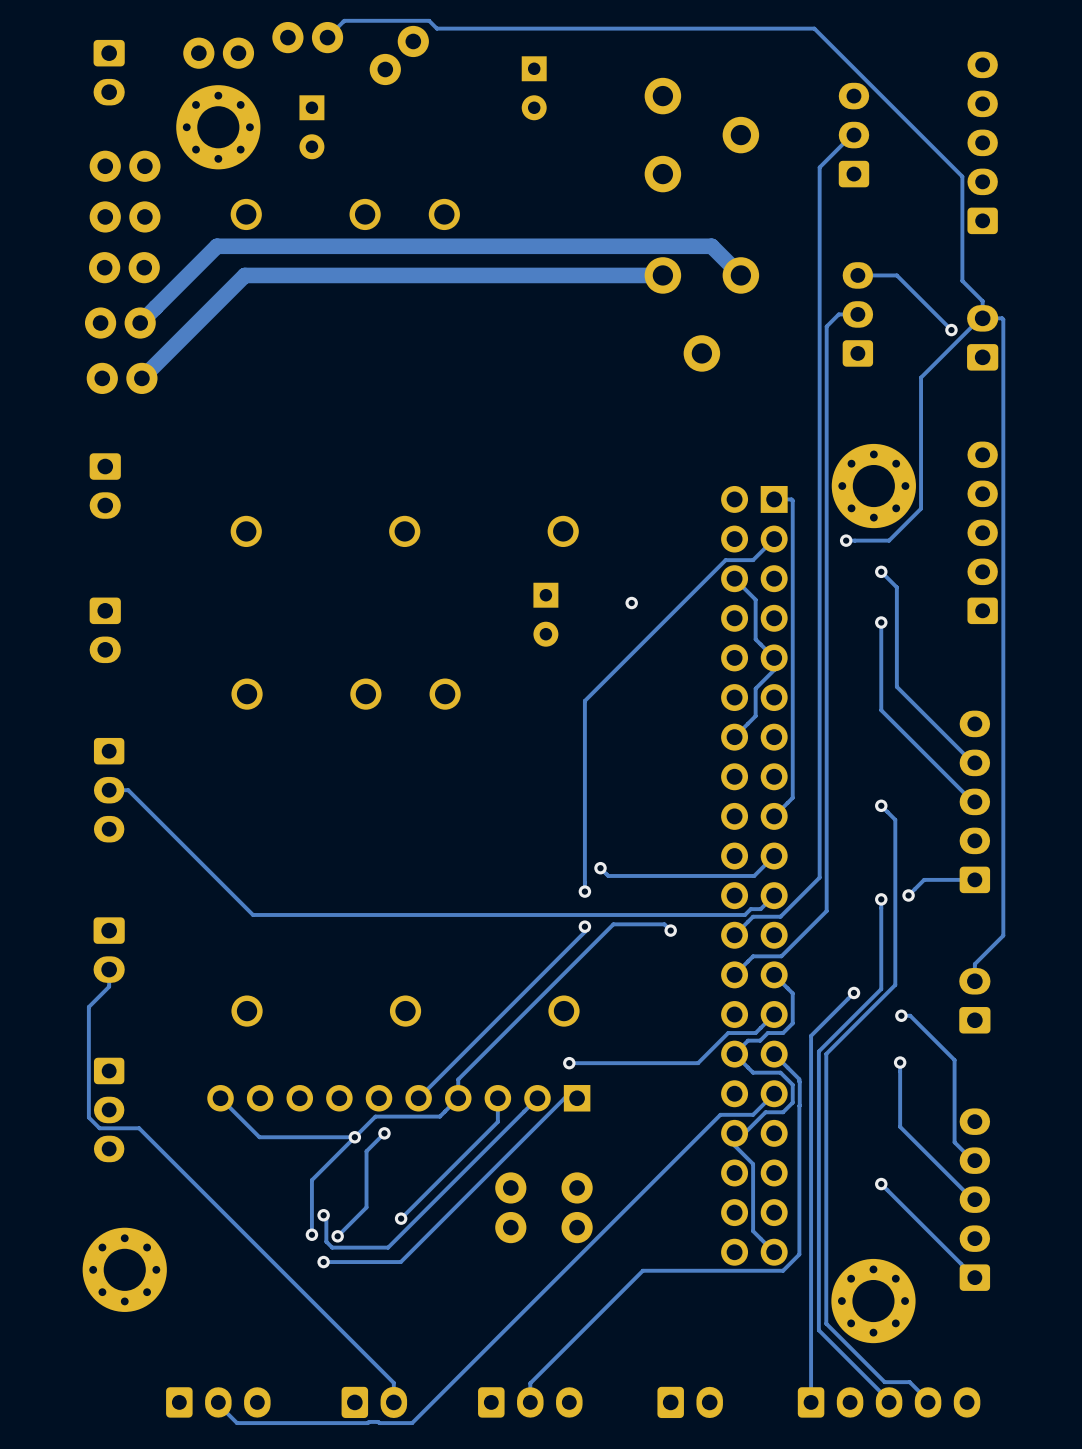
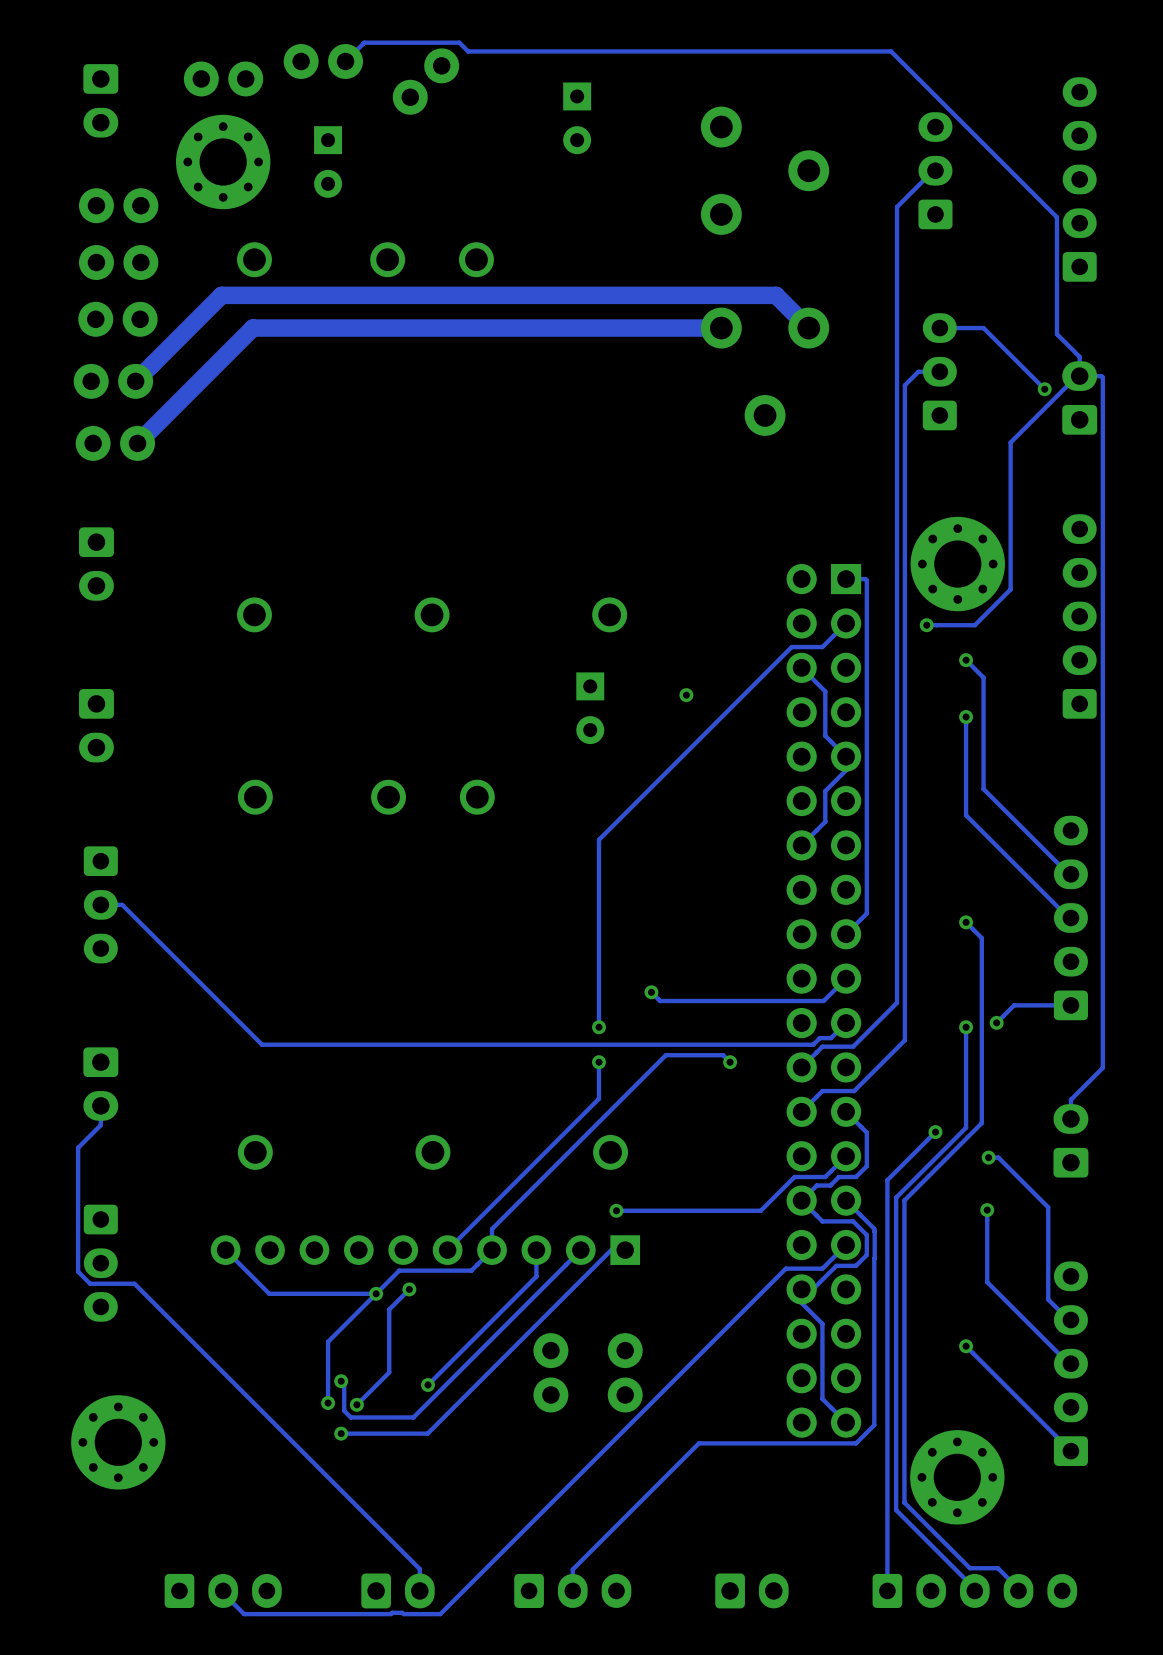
track: (584, 700) (584, 891) -> (633, 804) (599, 839) (599, 1027)
via: (584, 891) -> none
via: none -> (599, 1027)
track: (584, 926) (584, 931) (553, 963) -> (599, 1062) (599, 1098)
via: (584, 926) -> none
via: none -> (599, 1062)

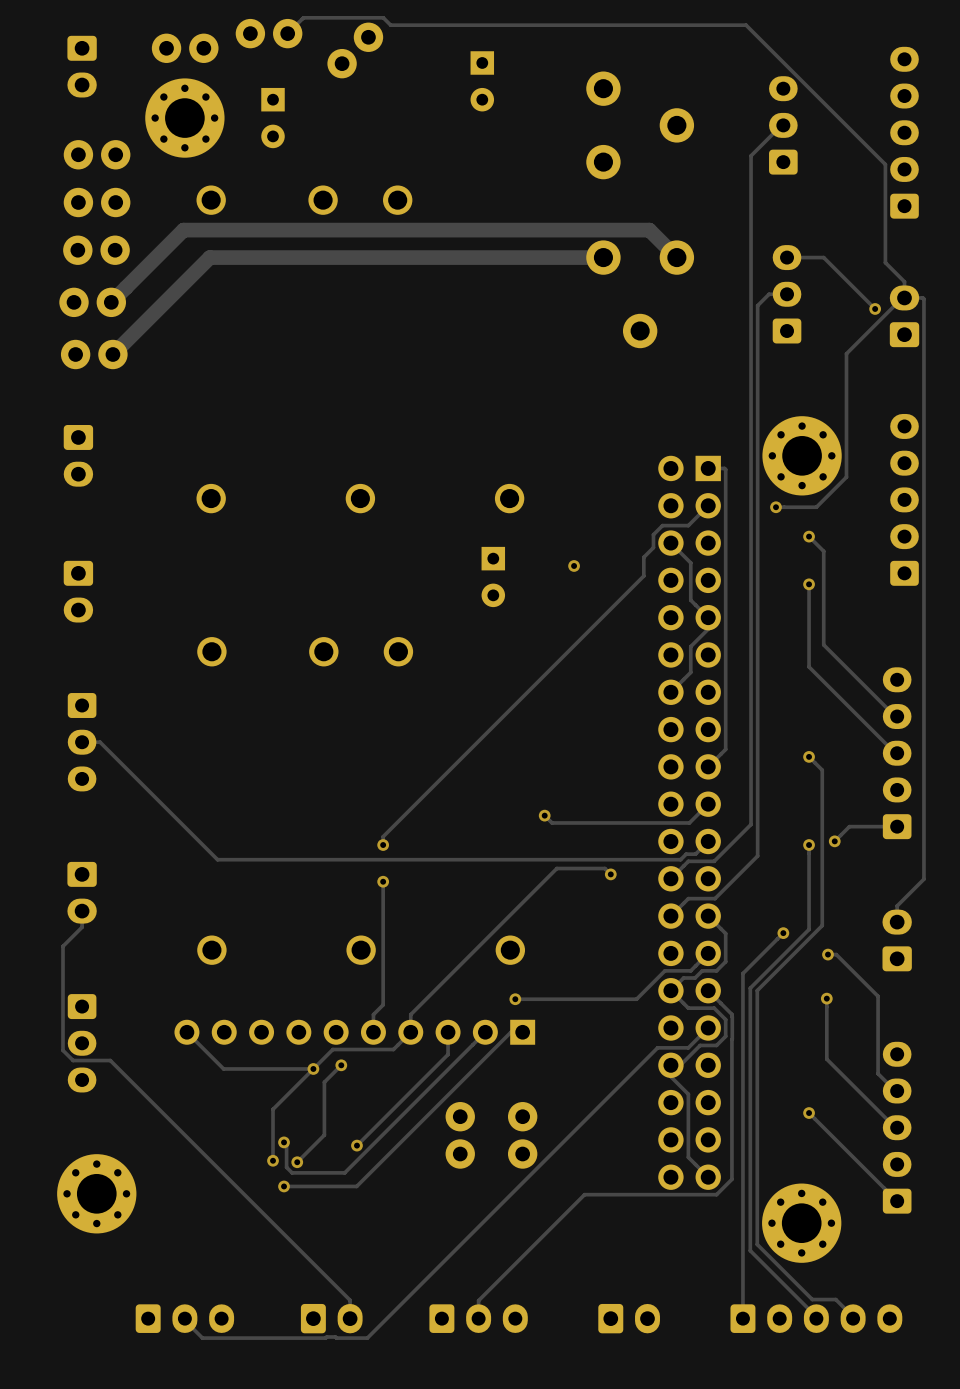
track: (780, 657) (599, 839) (599, 1027) -> (653, 534) (653, 547) (643, 557) (643, 576) (383, 836) (383, 845)
via: none -> (383, 845)
via: (599, 1027) -> none
track: (599, 1062) (599, 1098) (447, 1250) -> (383, 881) (383, 1004) (373, 1014) (373, 1032)
via: (599, 1062) -> none
via: none -> (383, 881)

